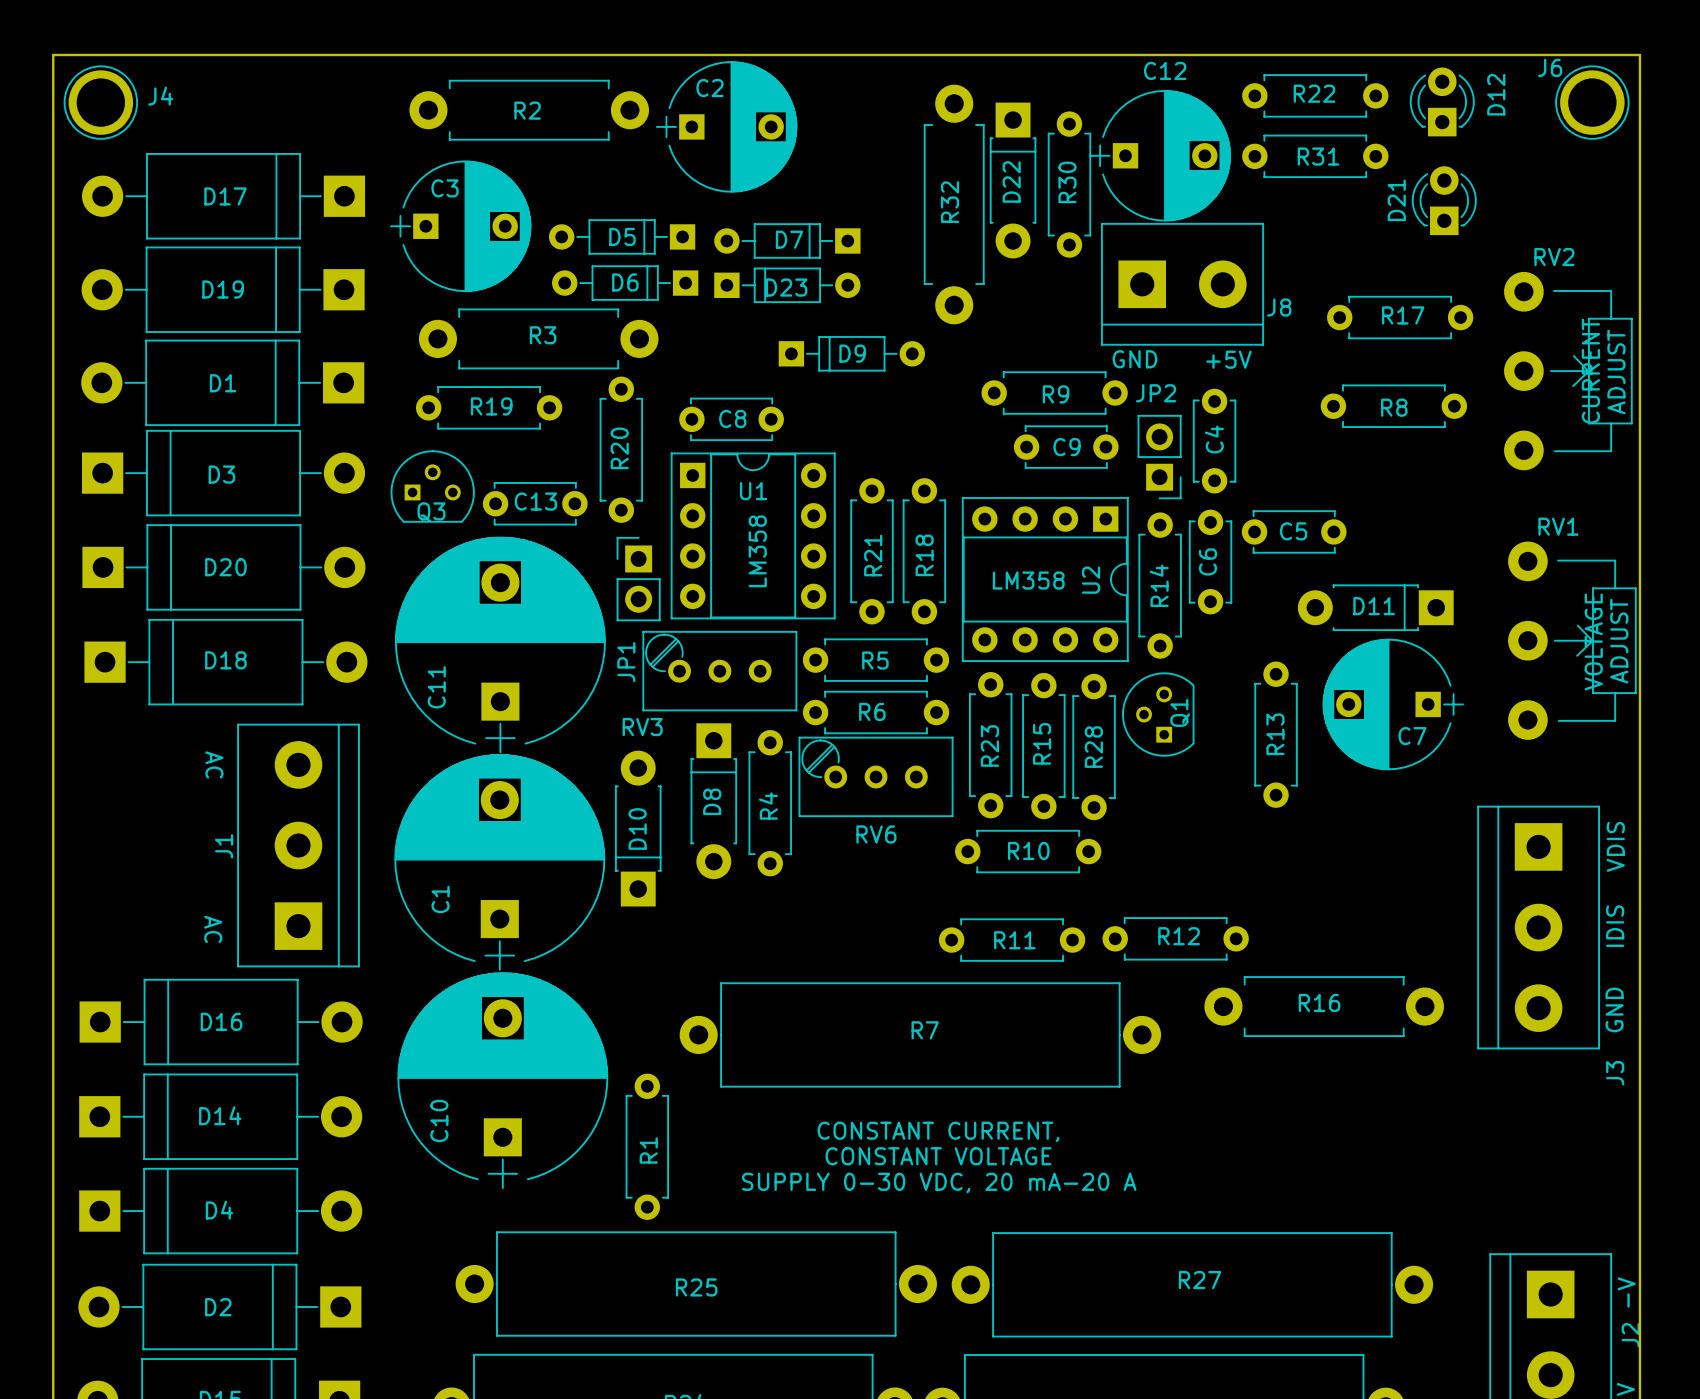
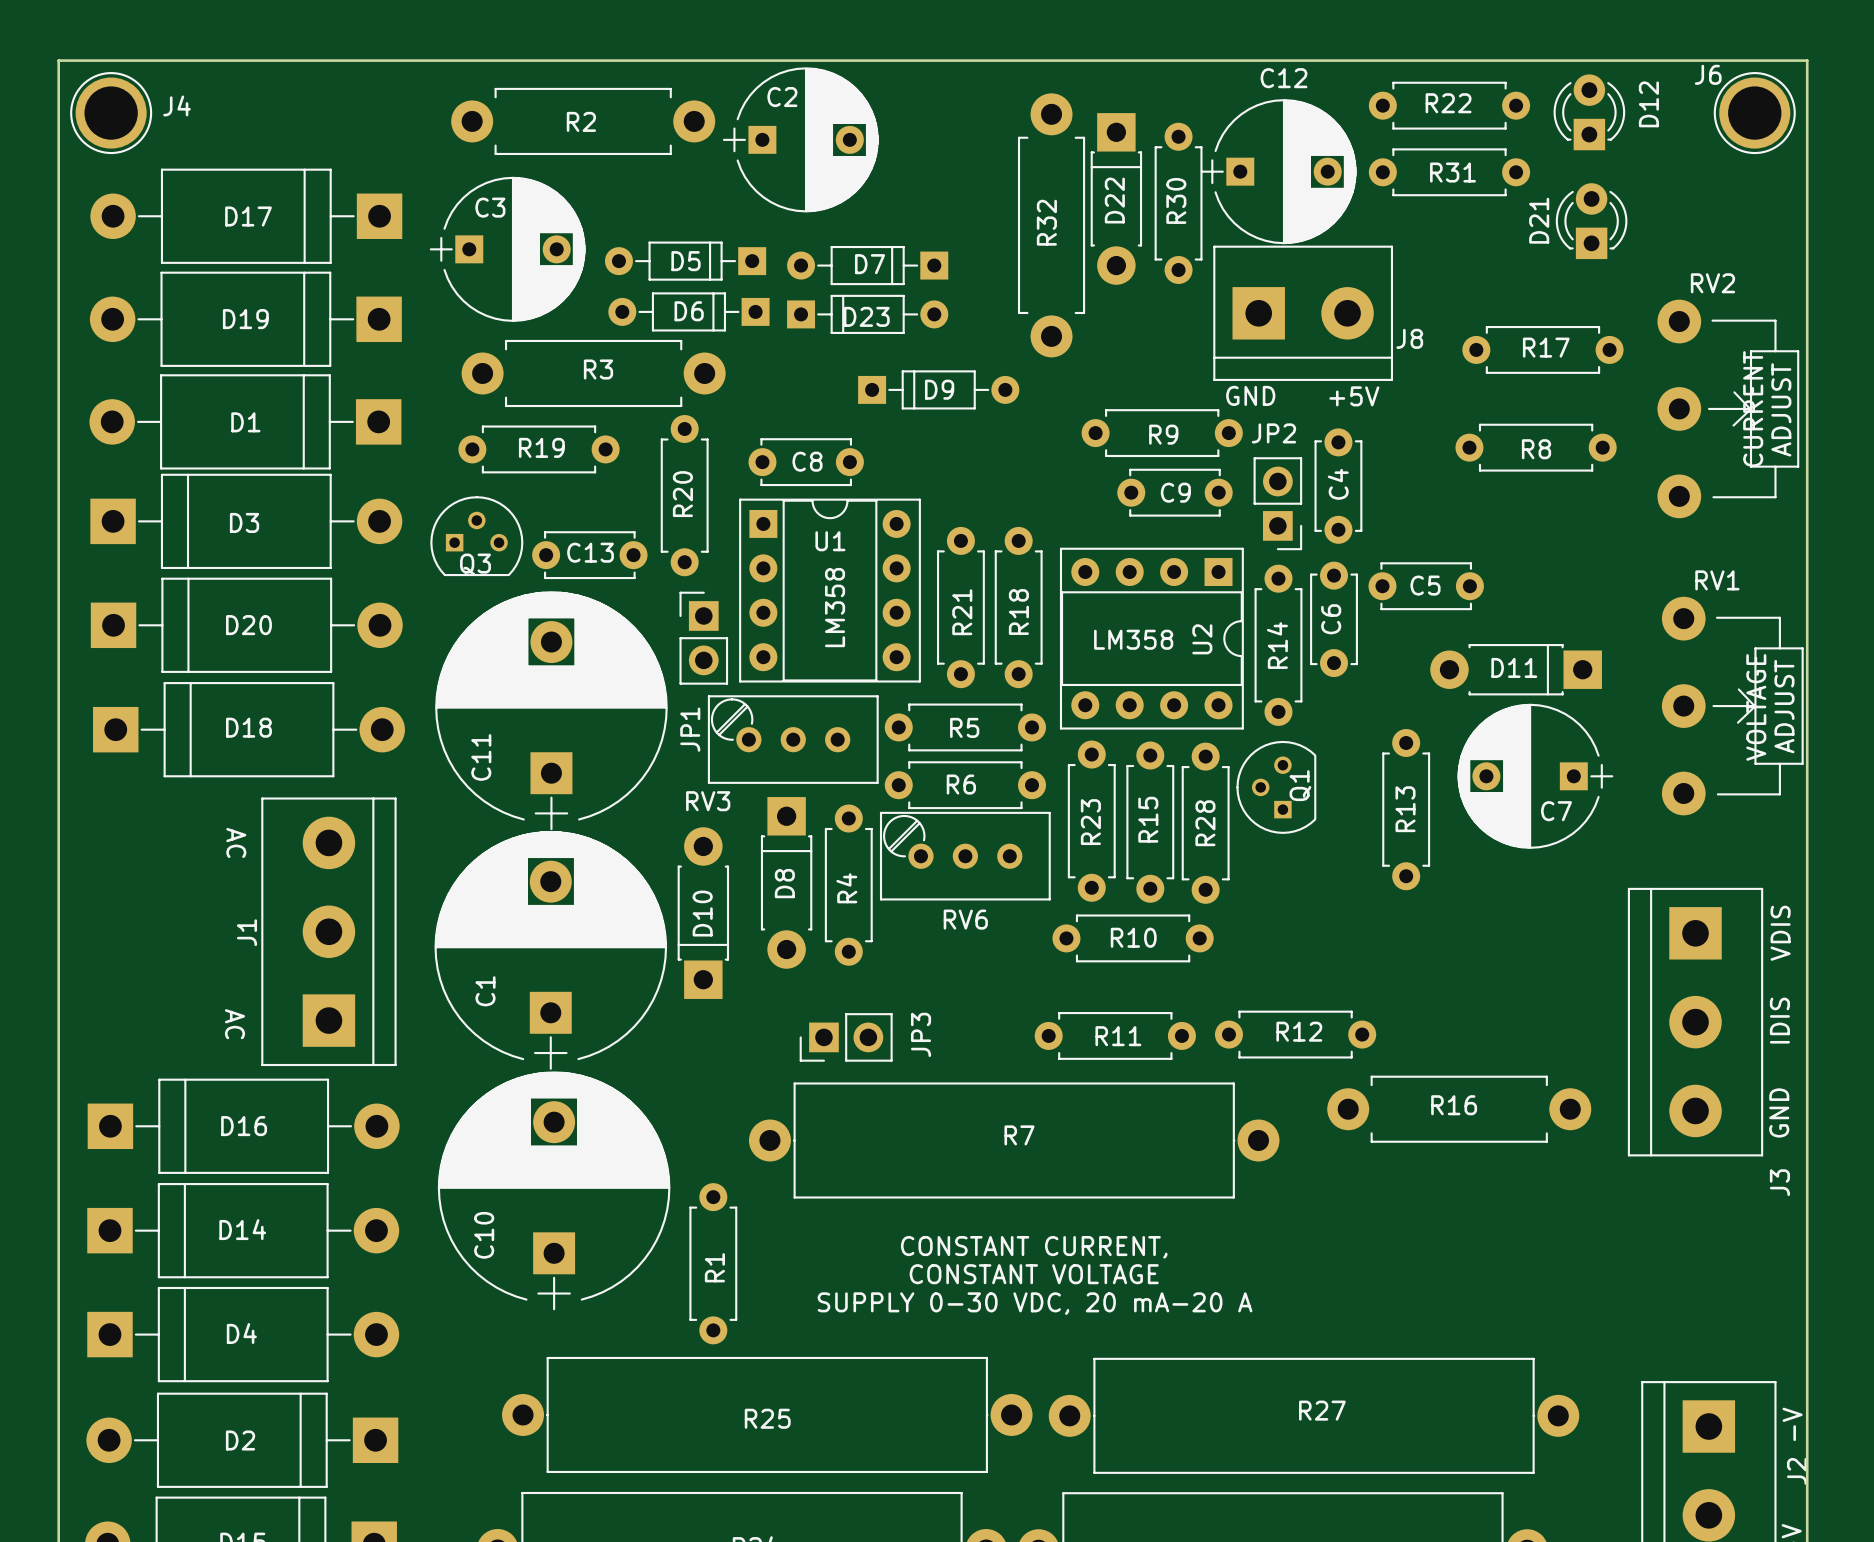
JP3: none -> (846, 1037)

